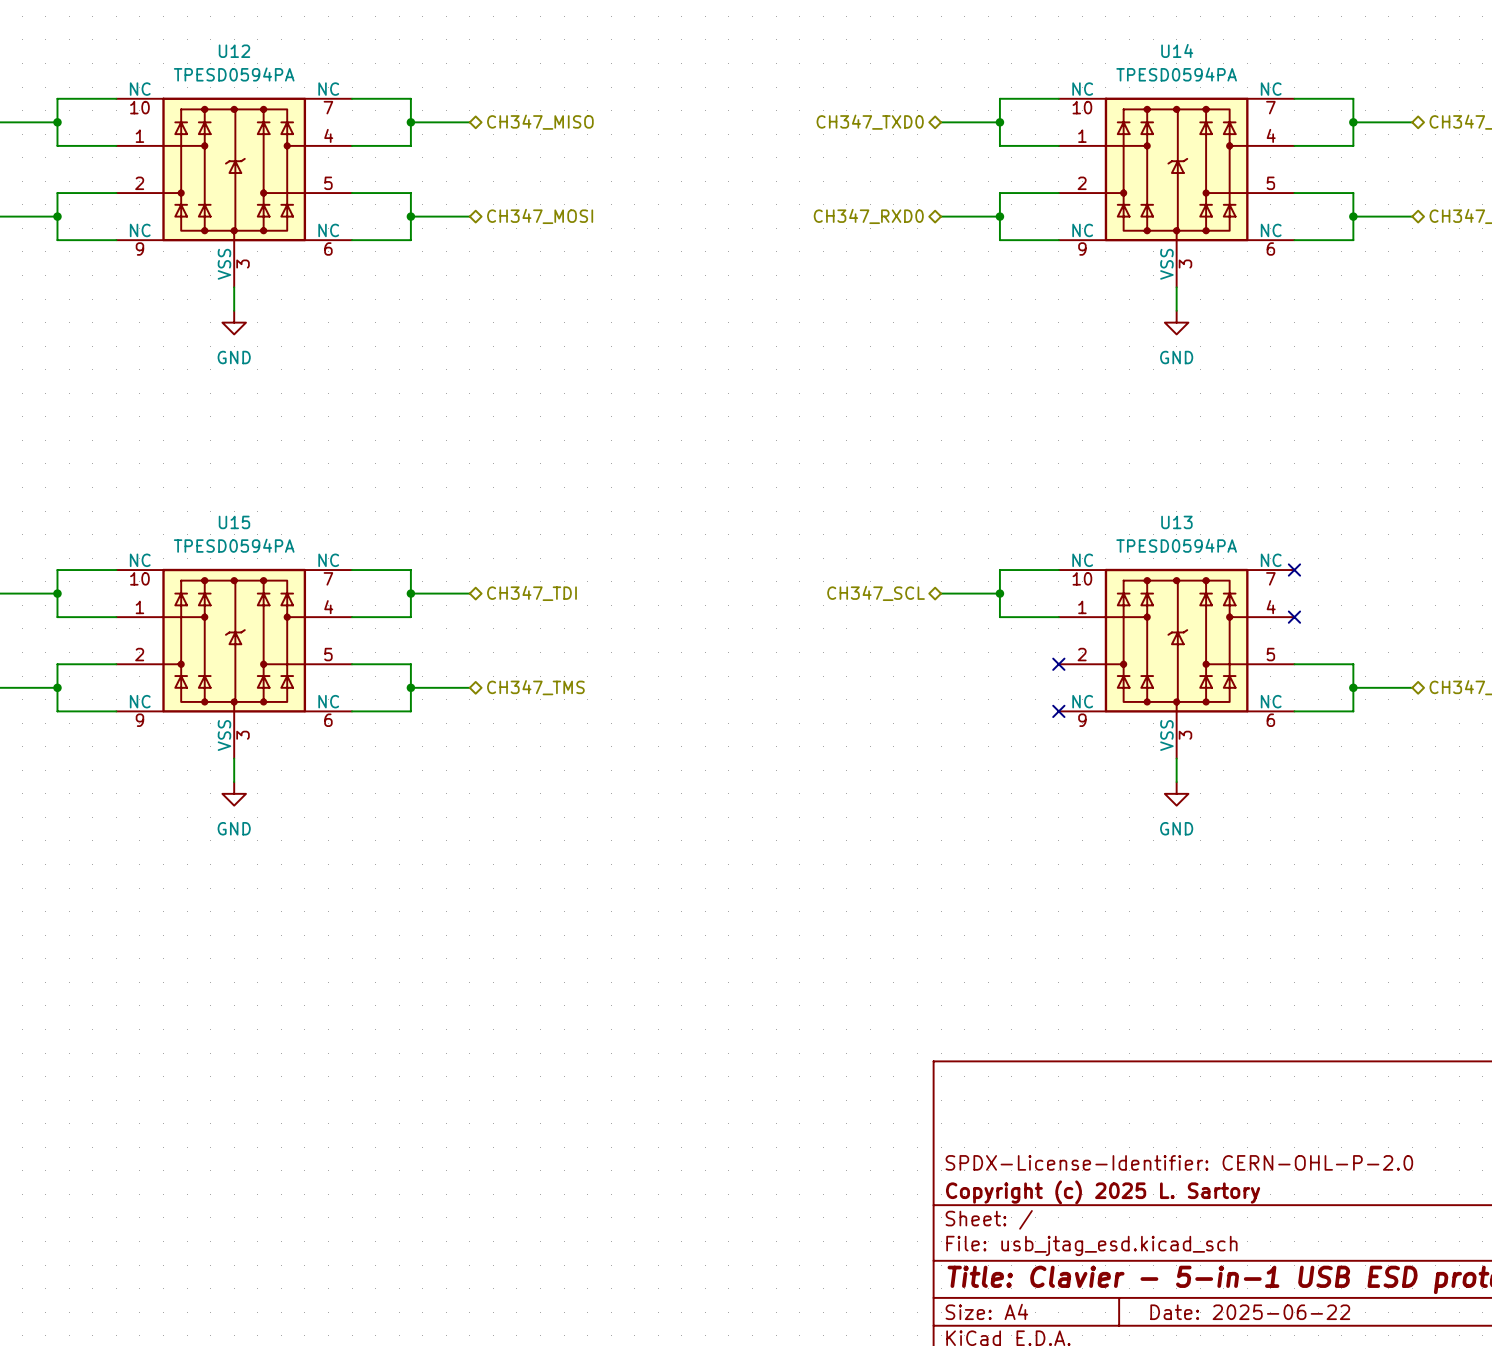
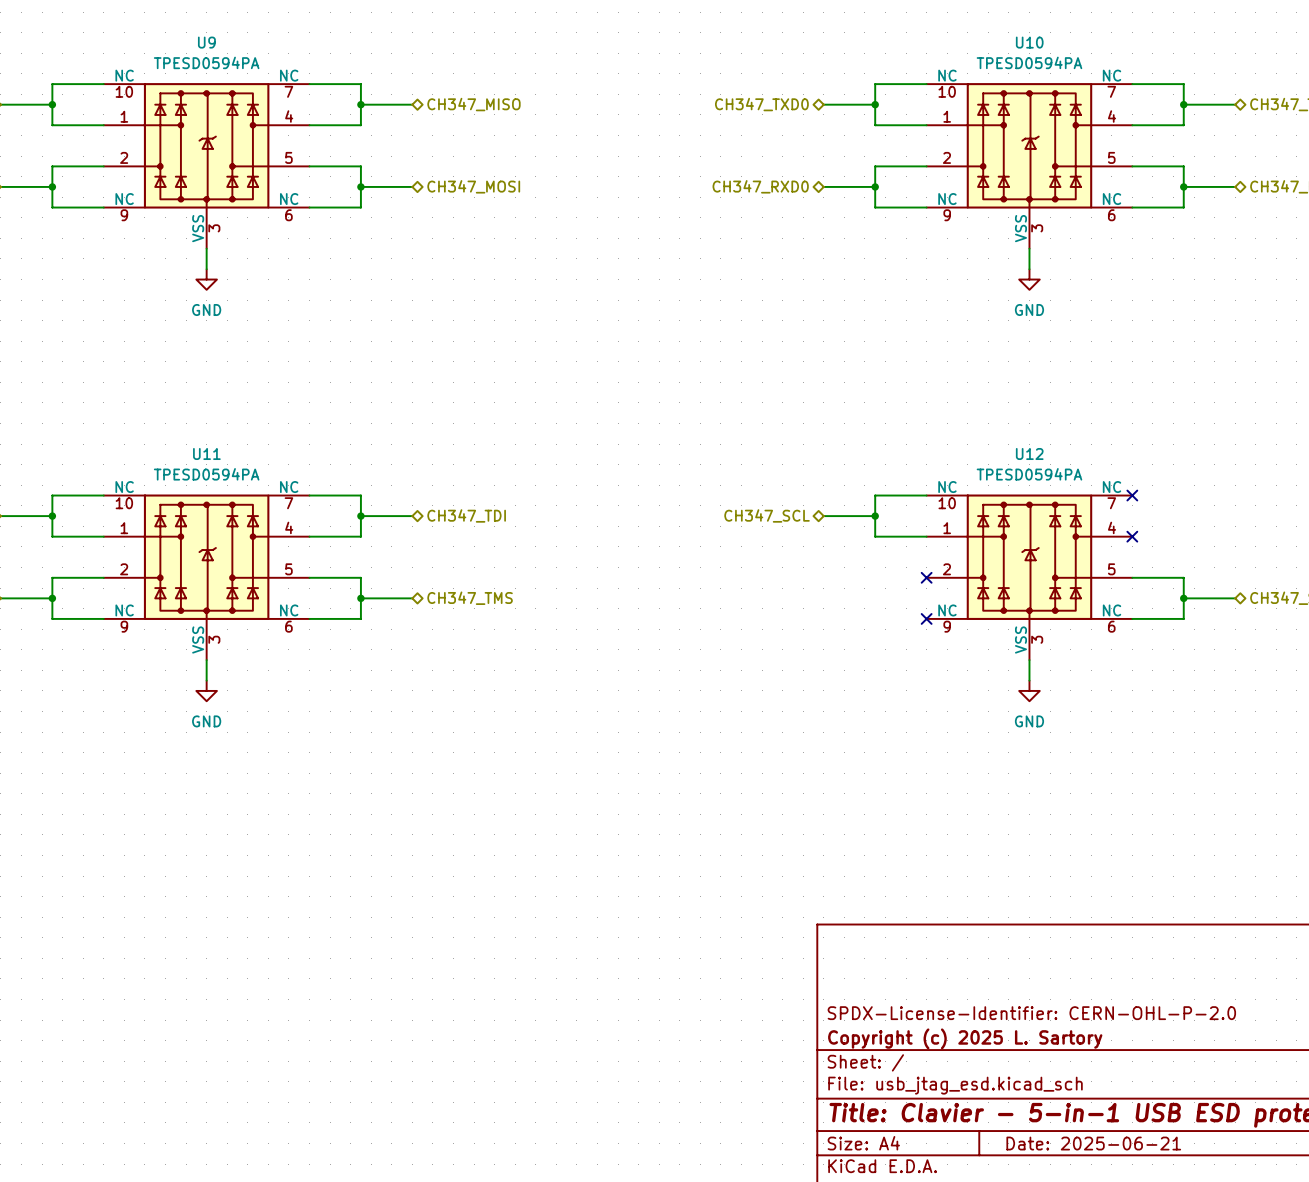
U14 name: U14 (1177, 50) -> U10 (1029, 42)
U12 name: U12 (234, 51) -> U9 (206, 42)
U15 name: U15 (234, 522) -> U11 (206, 454)
U13 name: U13 (1176, 522) -> U12 (1029, 454)
title block: Date: 2025-06-22 (1250, 1312) -> Date: 2025-06-21 (1093, 1143)

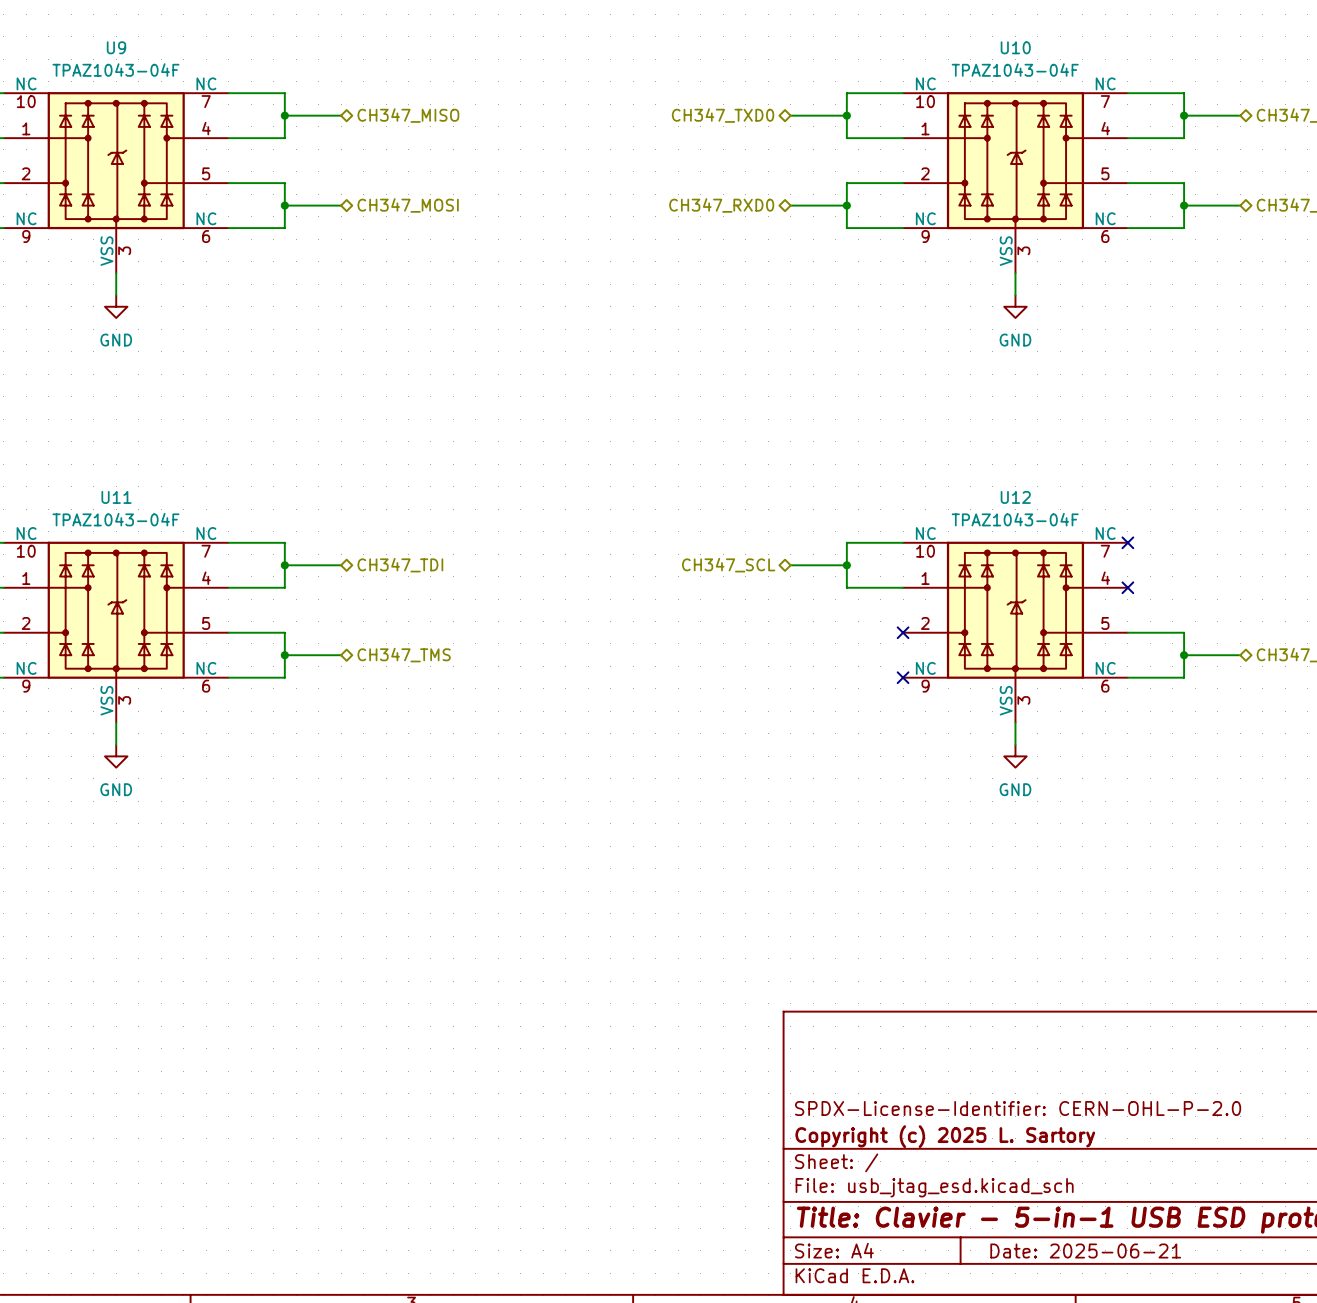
U9 value: TPESD0594PA (206, 62) -> TPAZ1043-04F (115, 70)
U10 value: TPESD0594PA (1029, 62) -> TPAZ1043-04F (1015, 70)
U11 value: TPESD0594PA (206, 474) -> TPAZ1043-04F (115, 519)
U12 value: TPESD0594PA (1029, 474) -> TPAZ1043-04F (1015, 519)

